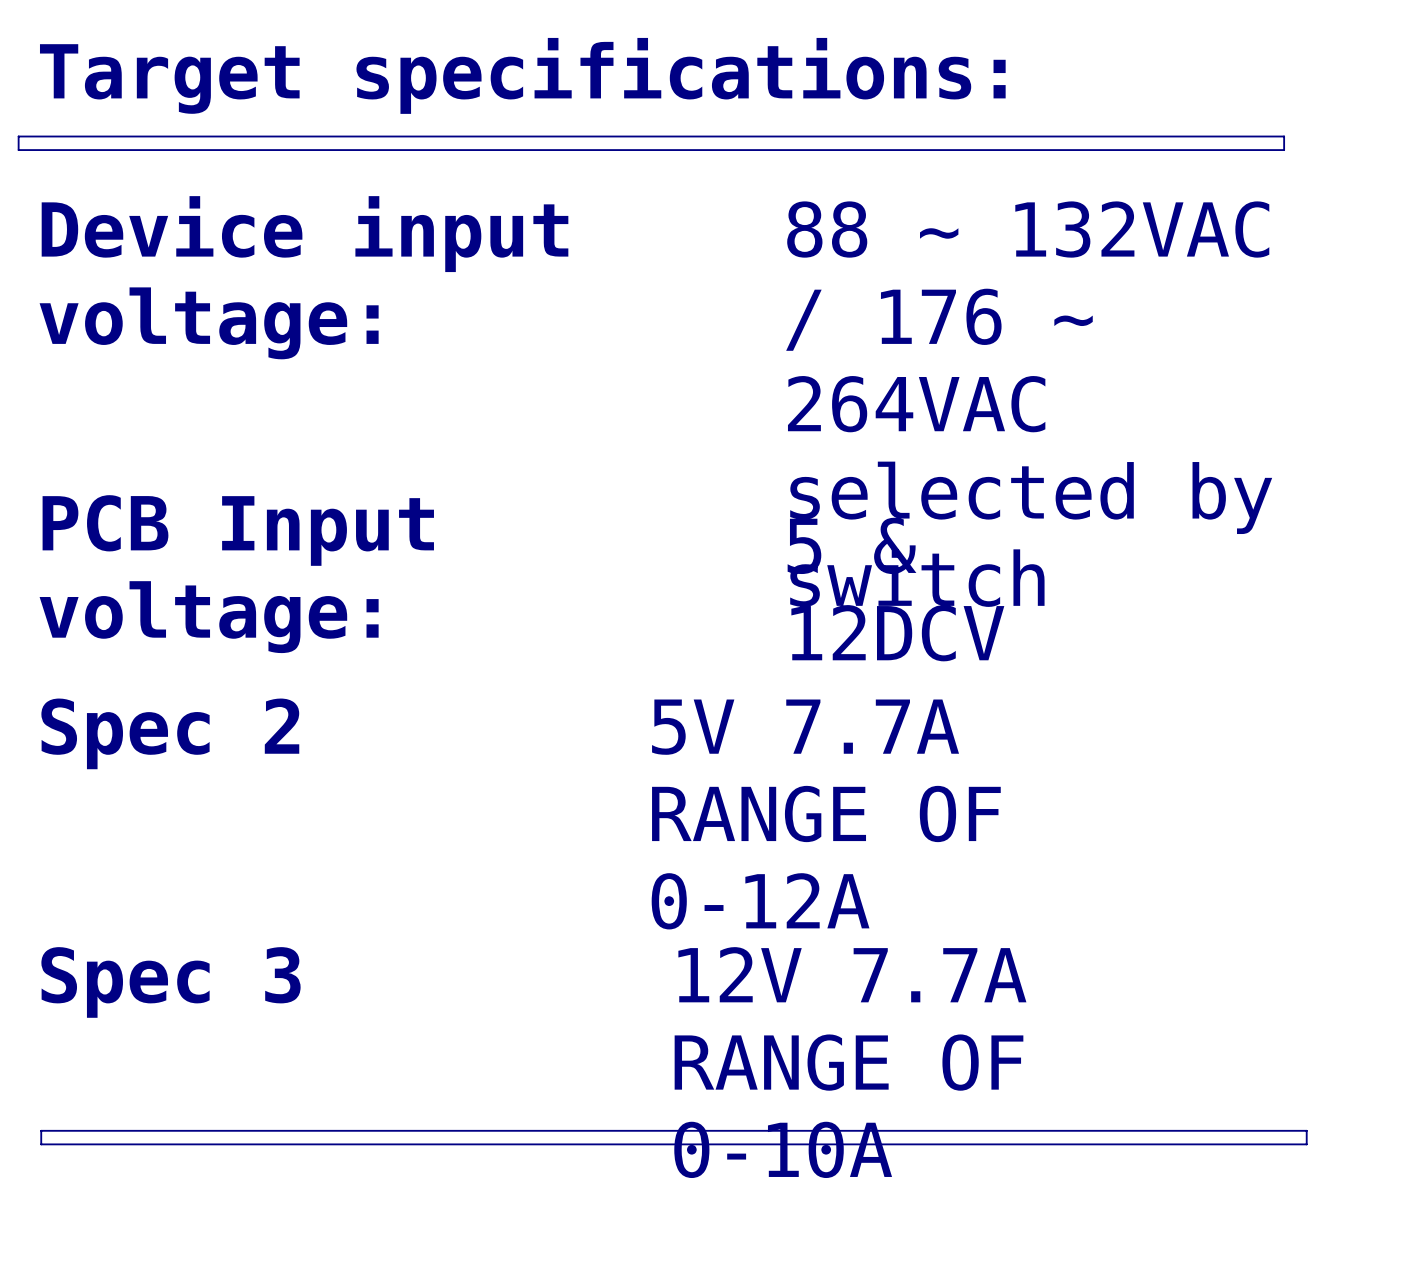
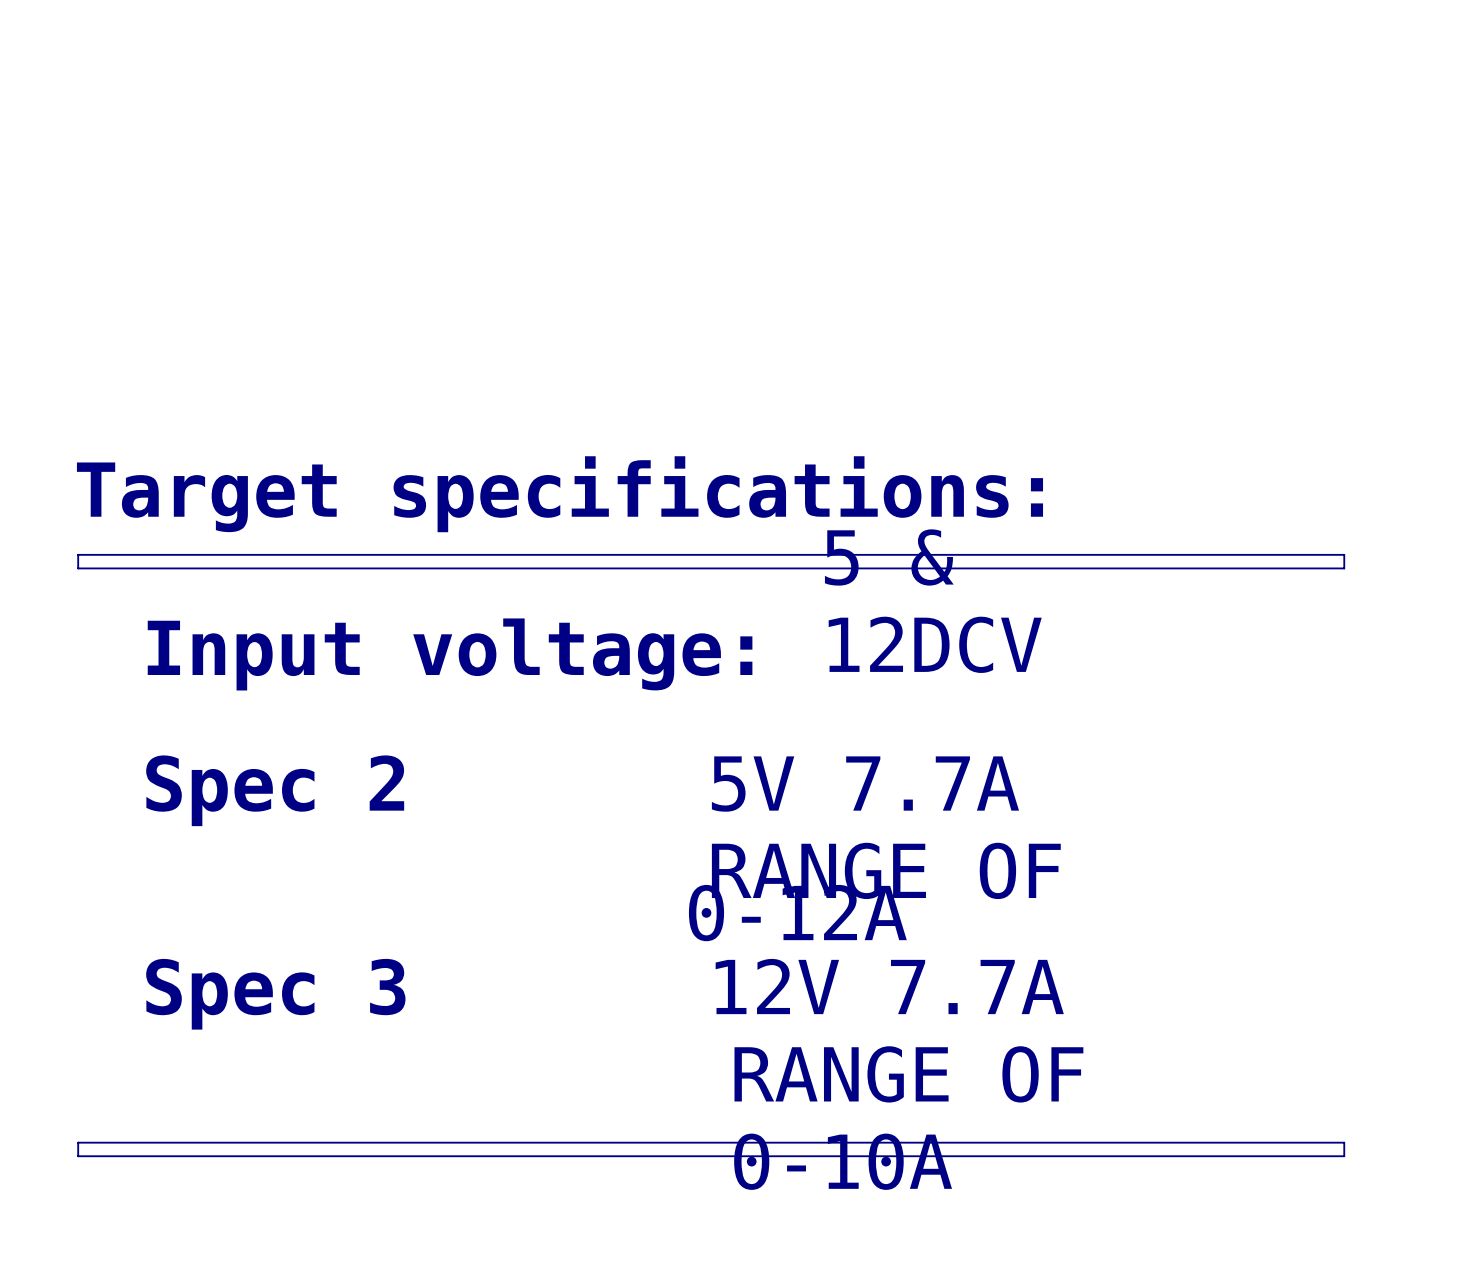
text position: Target specifications: (522, 75) -> Target specifications: (559, 494)
line: (18, 136) (1284, 136) (1284, 150) (18, 150) (18, 136) -> (78, 554) (1344, 554) (1344, 568) (78, 568) (78, 554)
text: 88 ~ 132VAC (1028, 229) -> none
text: Device input (305, 234) -> none
text: / 176 ~ (939, 319) -> none
text: voltage: (209, 323) -> none
text: 264VAC (916, 404) -> none
text: selected by (1031, 497) -> none
text: PCB Input (238, 530) -> none
text: switch (917, 578) -> none
text: voltage: (209, 617) -> Input voltage: (450, 654)
text position: 5V 7.7A (805, 727) -> 5V 7.7A (865, 784)
text position: Spec 2 (170, 733) -> Spec 2 (275, 790)
text position: RANGE OF (826, 813) -> RANGE OF (886, 870)
text position: Spec 3 (171, 982) -> Spec 3 (275, 994)
text position: RANGE OF (849, 1062) -> RANGE OF (908, 1074)
text position: 0-10A (783, 1149) -> 0-10A (843, 1161)

